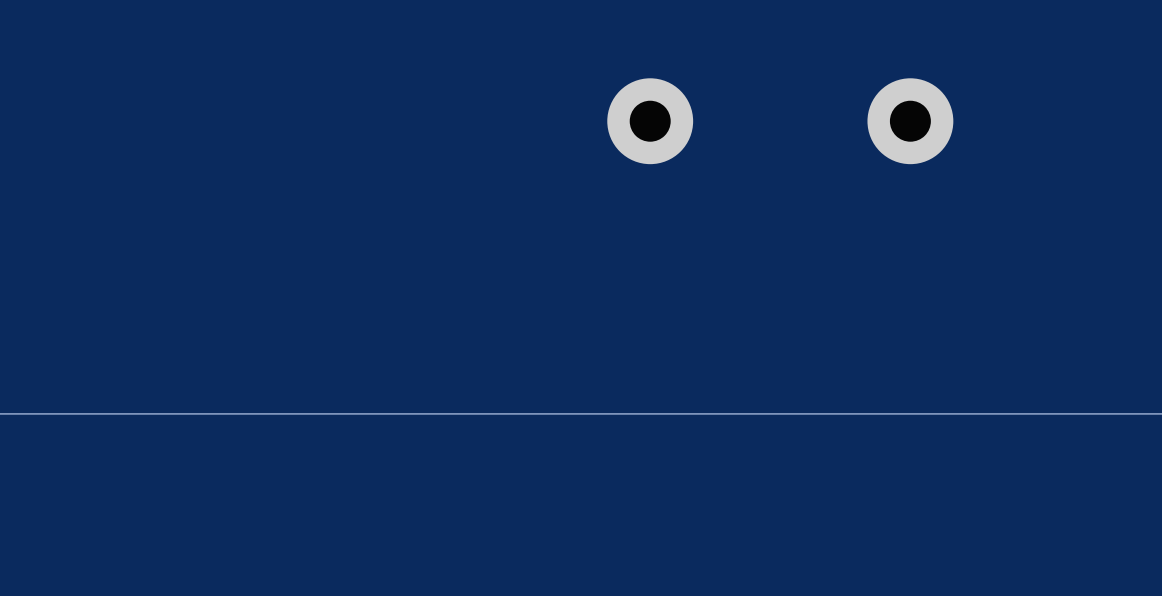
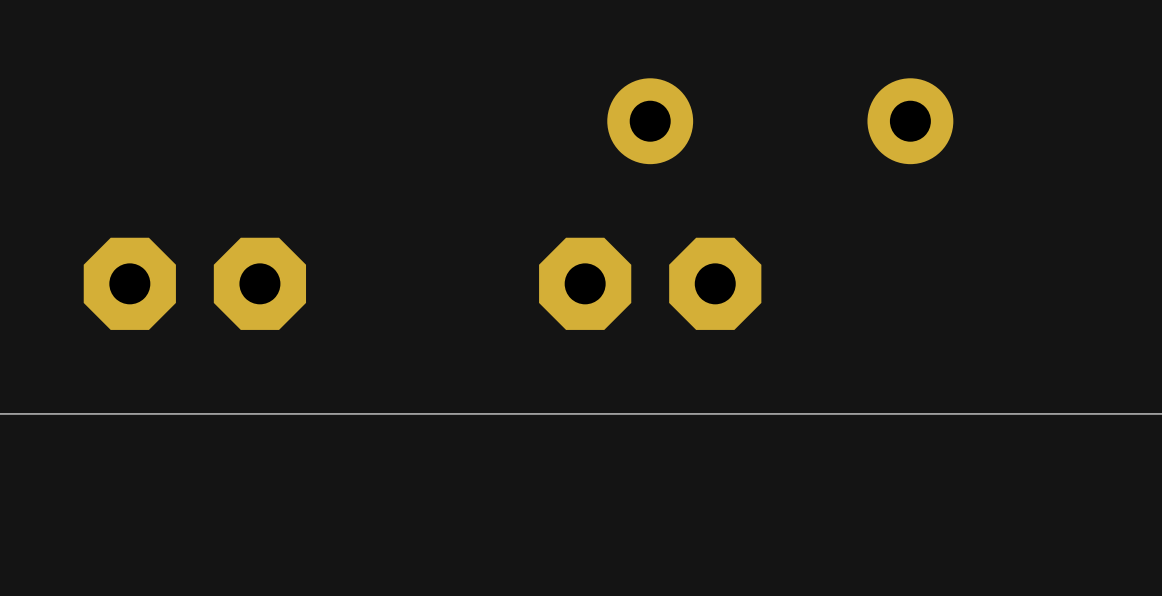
part: none -> (194, 283)
part: none -> (650, 283)

